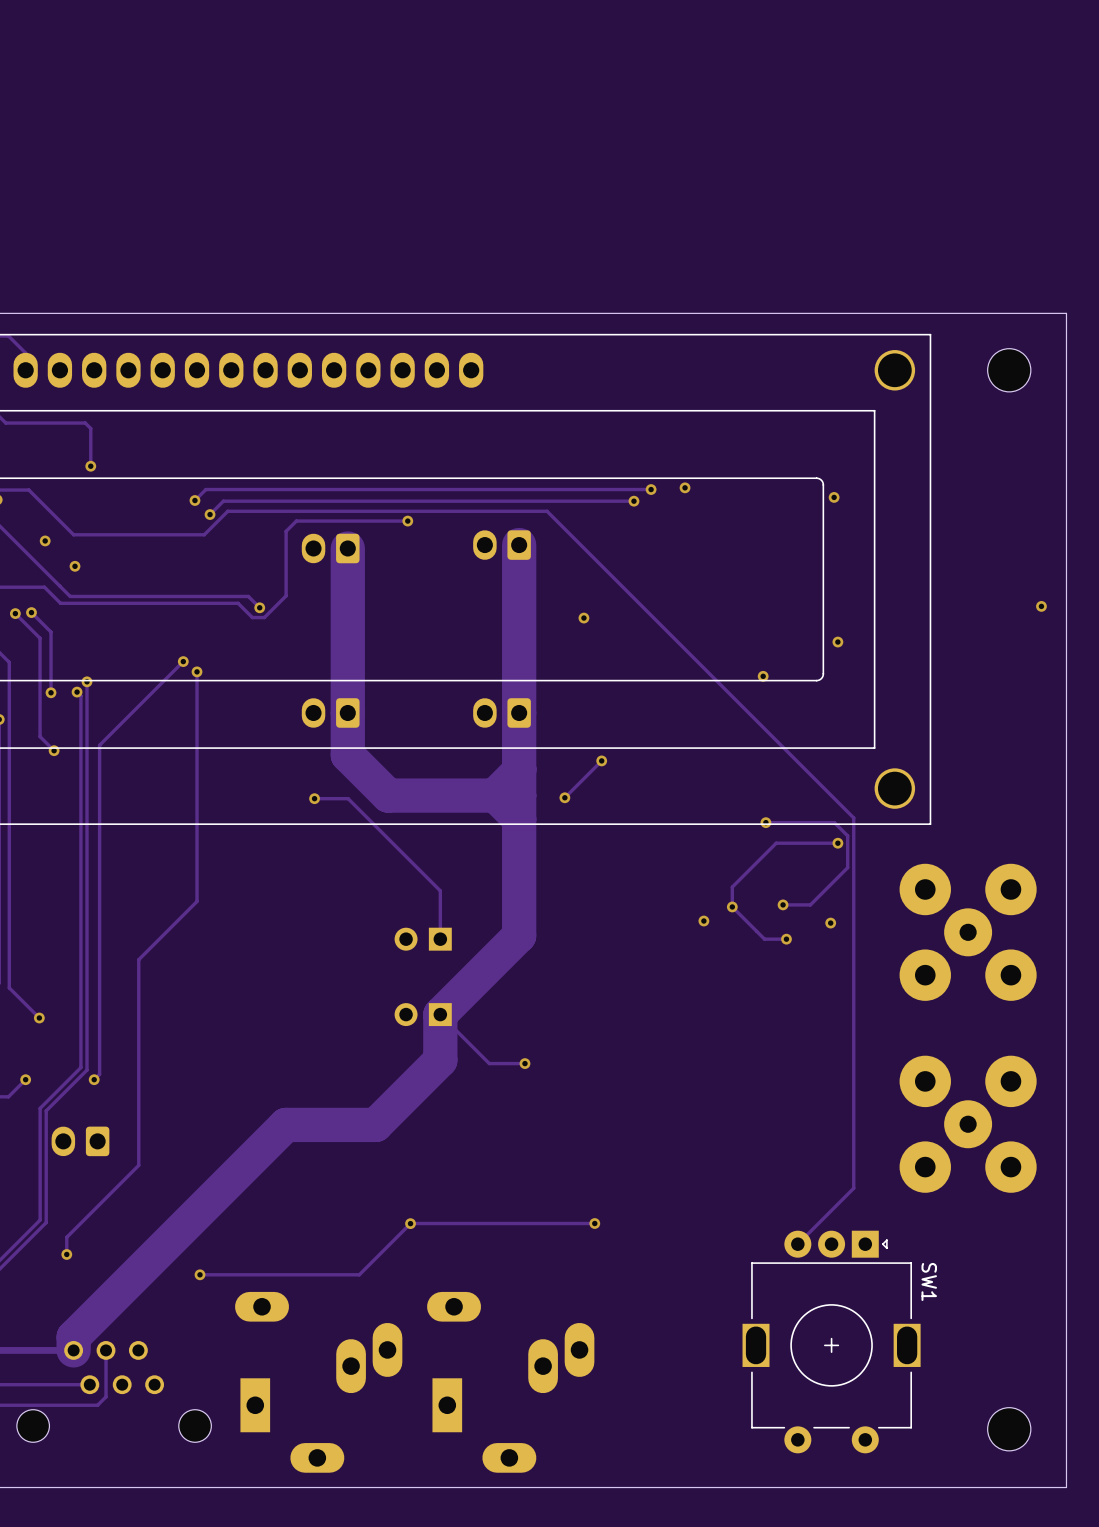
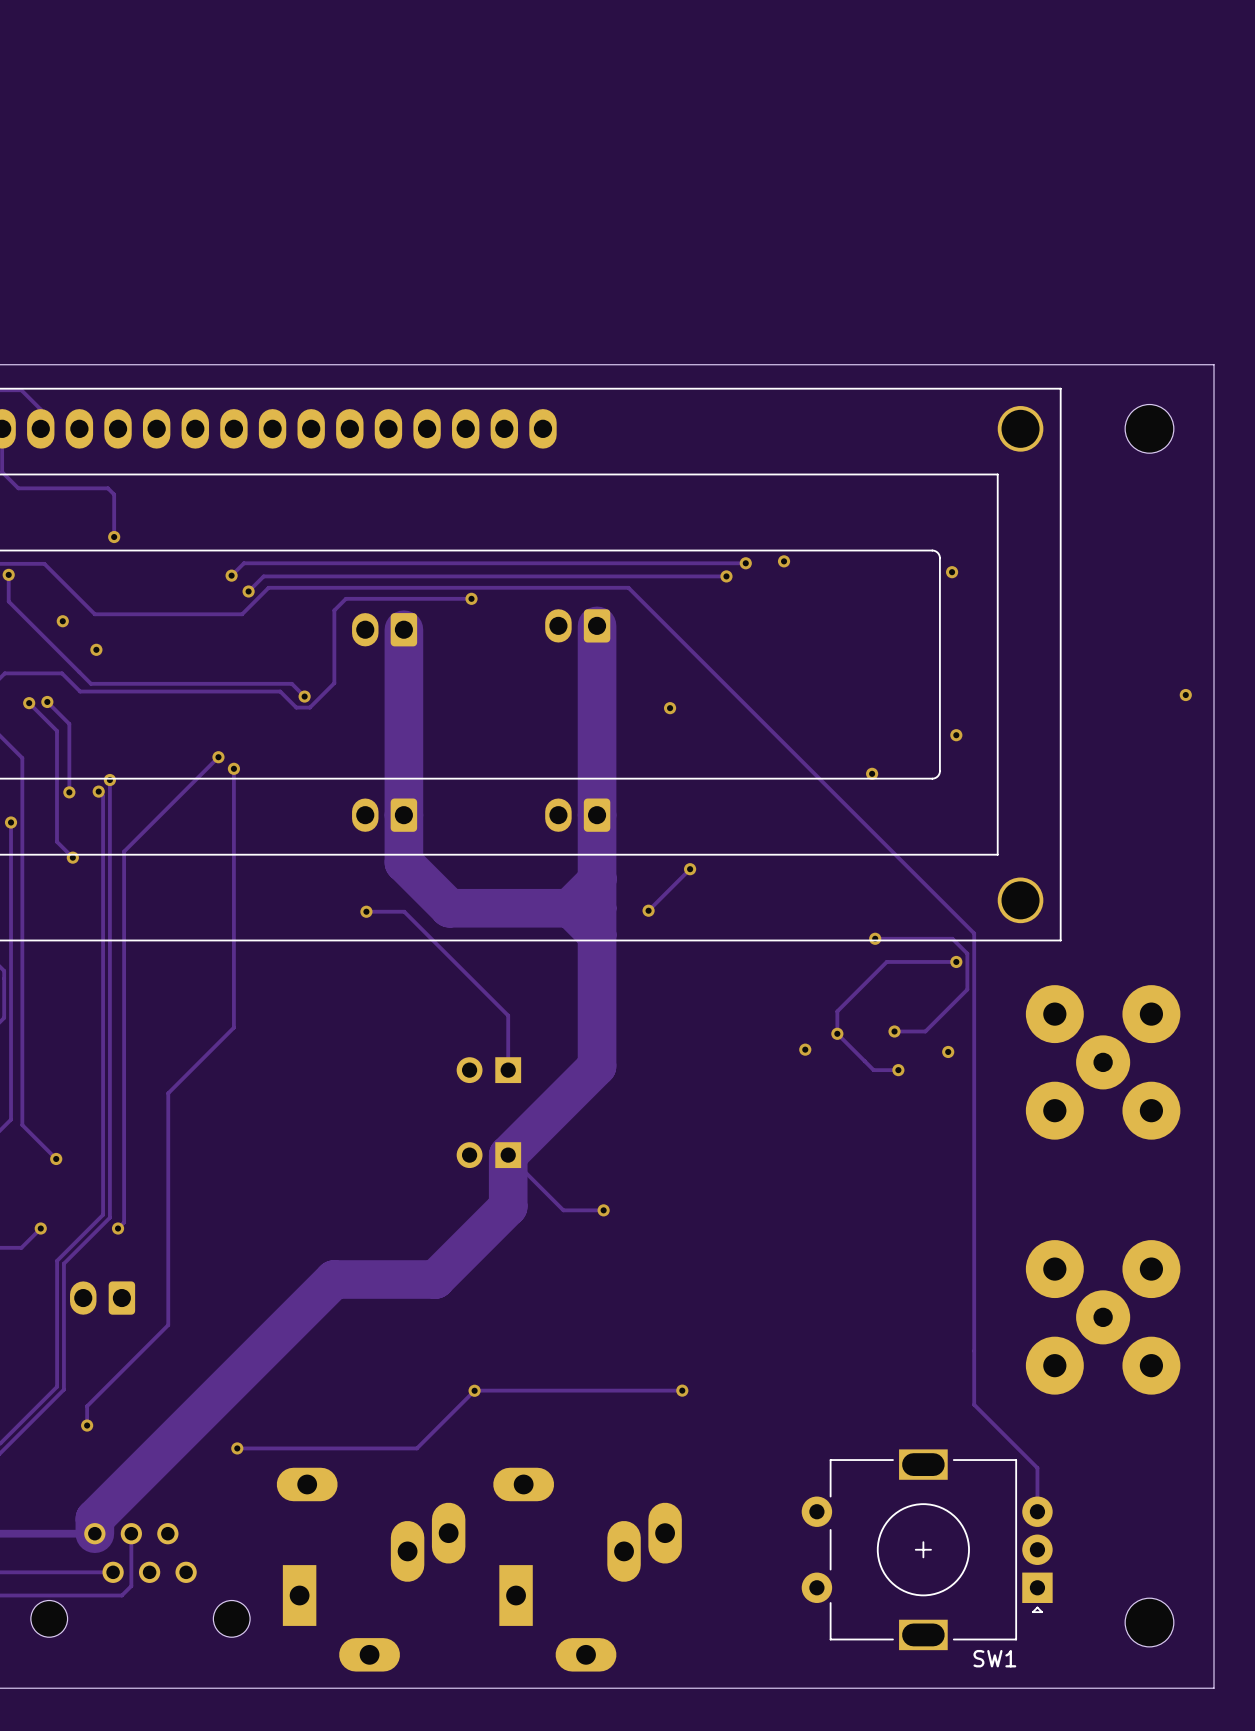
part position: (968, 1124) -> (1103, 1317)
track: (853, 1188) (797, 1244) -> (974, 1350) (974, 1404) (1037, 1468) (1037, 1511)
SW1 rotation: 0° (831, 1342) -> 90° clockwise (927, 1549)

